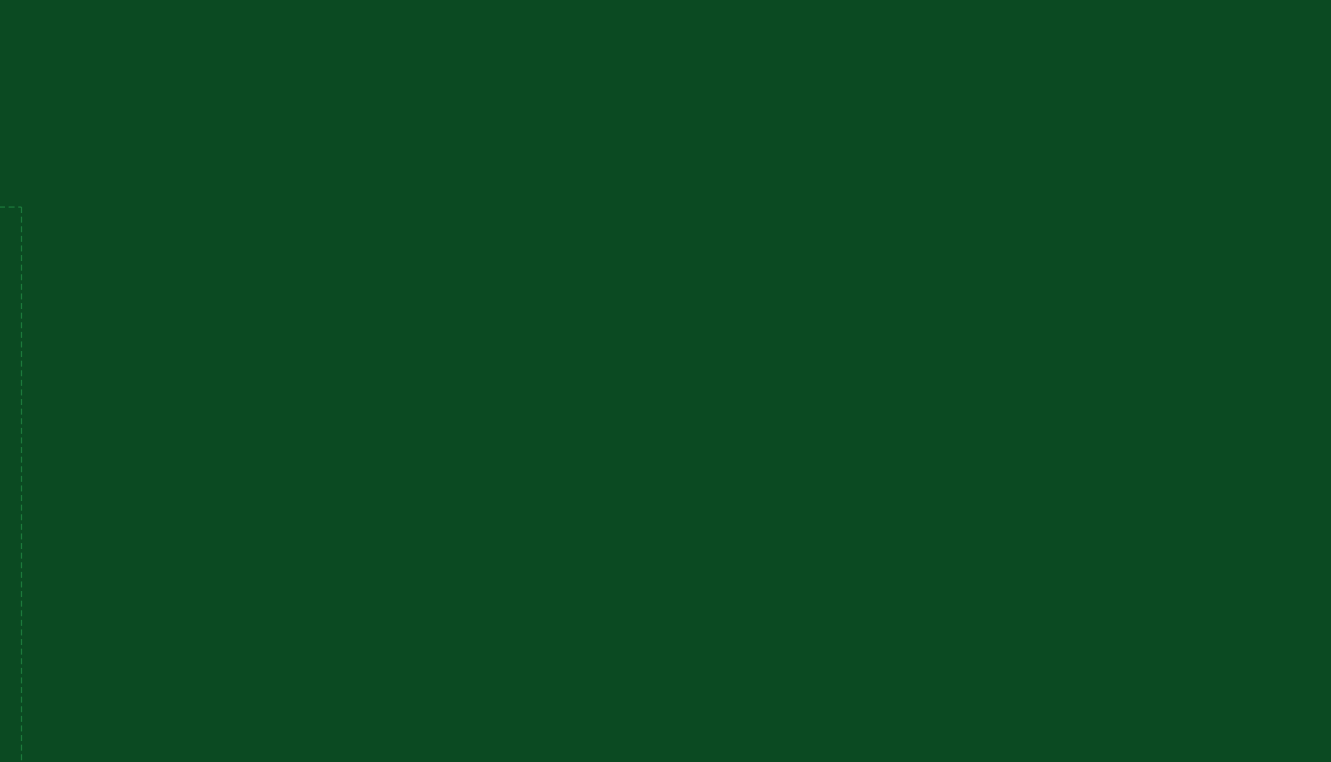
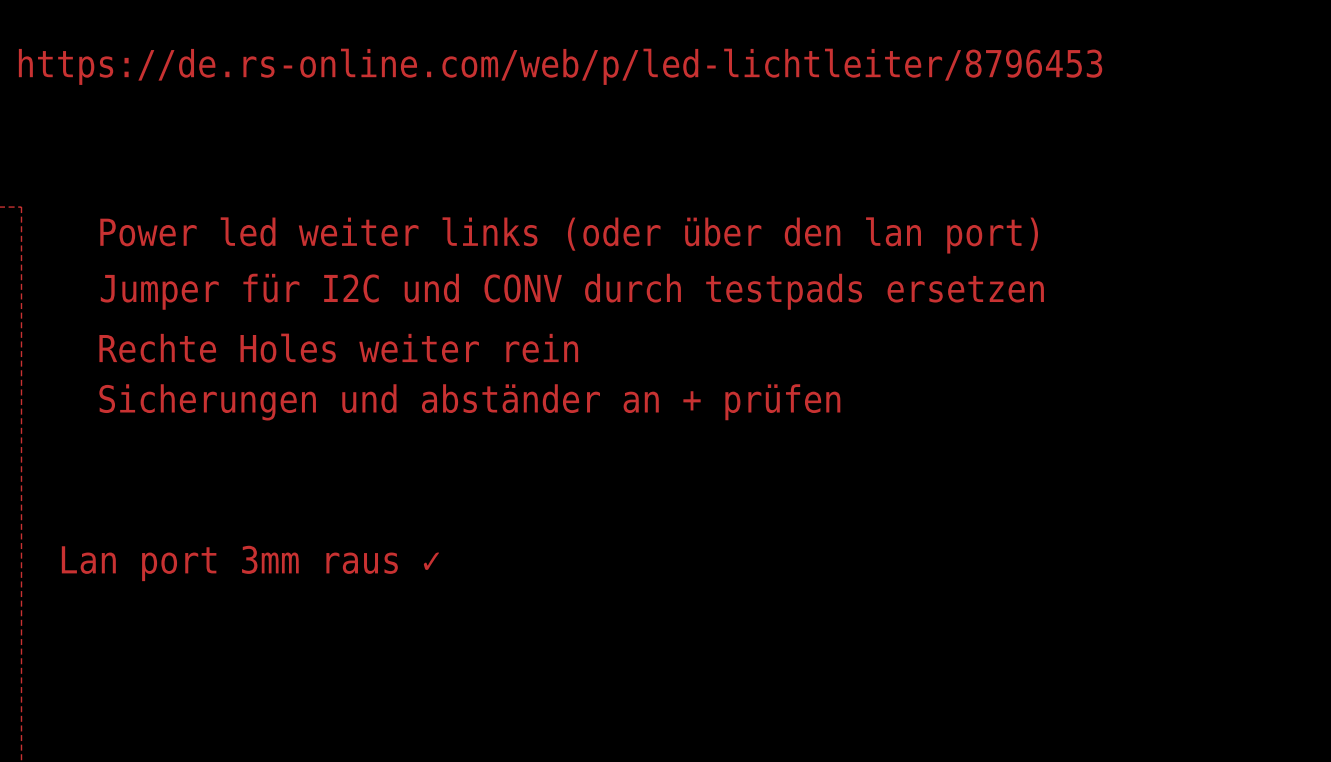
text: none -> https://de.rs-online.com/web/p/led-lichtleiter/8796453 (560, 66)
text: none -> Power led weiter links (oder über den lan port) (569, 235)
text: none -> Jumper für I2C und CONV durch testpads ersetzen (572, 291)
text: none -> Rechte Holes weiter rein (338, 348)
text: none -> Sicherungen und abständer an + prüfen (469, 402)
text: none -> Lan port 3mm raus ✓ (250, 563)

